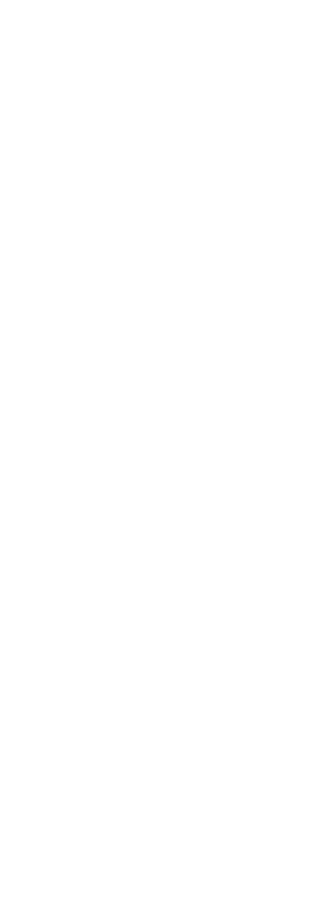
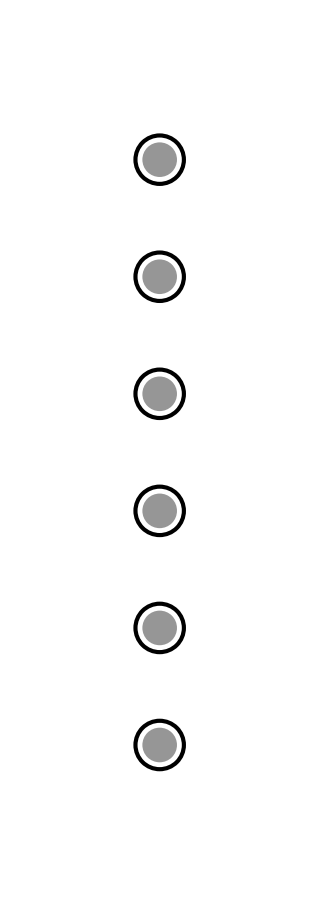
part: none -> (159, 159)
part: none -> (159, 276)
part: none -> (159, 393)
part: none -> (159, 510)
part: none -> (159, 627)
part: none -> (159, 744)

